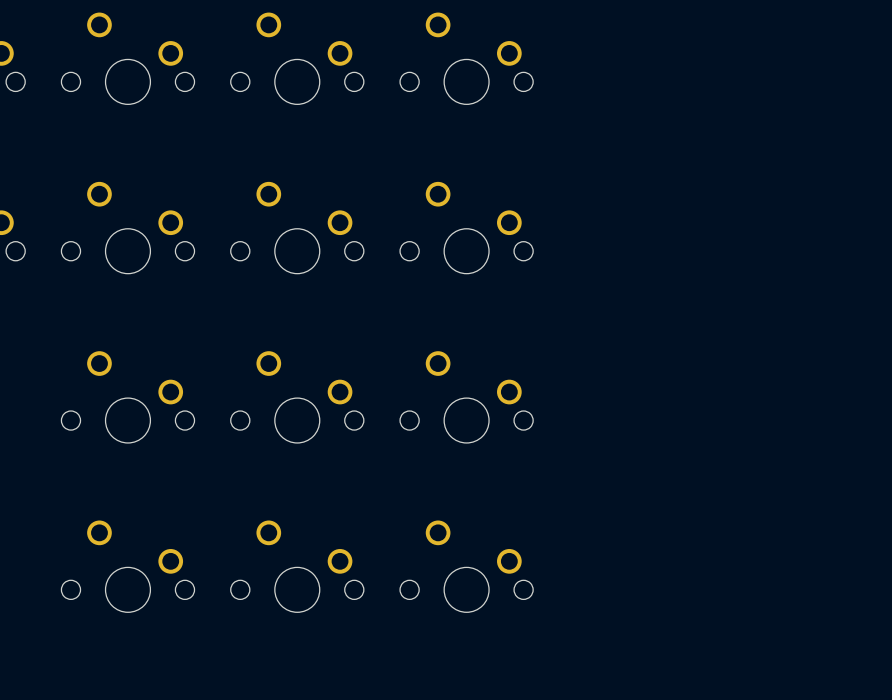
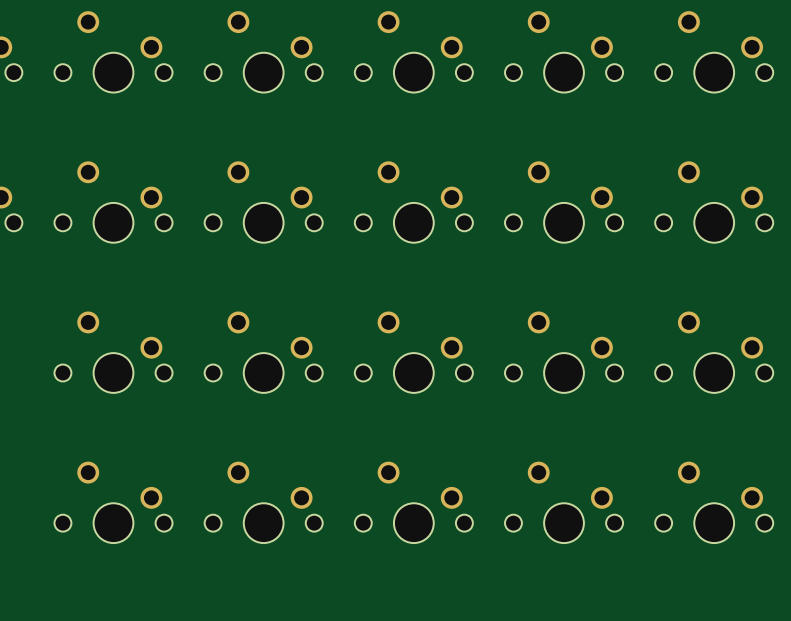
part: none -> (564, 51)
part: none -> (714, 51)
part: none -> (564, 202)
part: none -> (714, 202)
part: none -> (564, 352)
part: none -> (714, 352)
part: none -> (564, 502)
part: none -> (714, 502)

